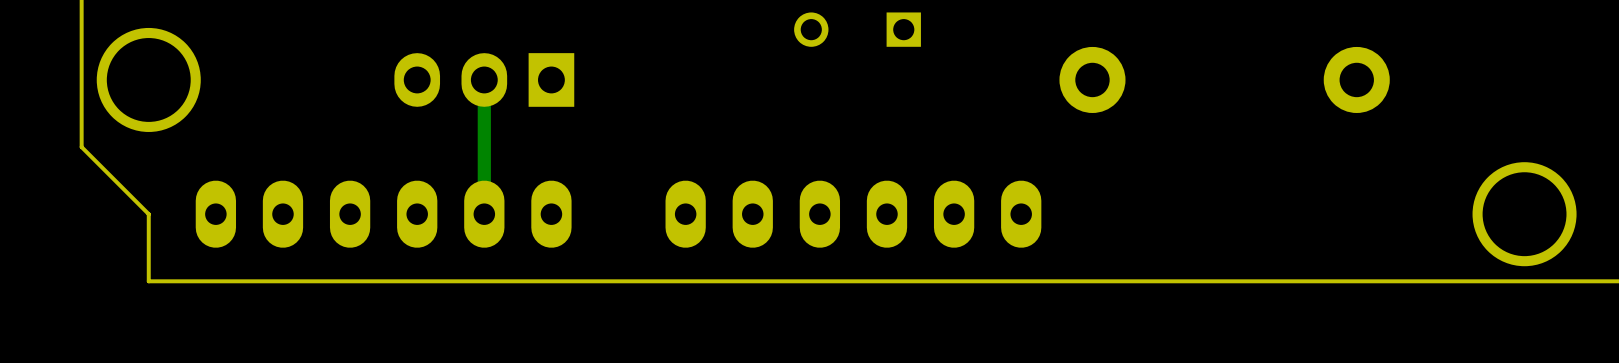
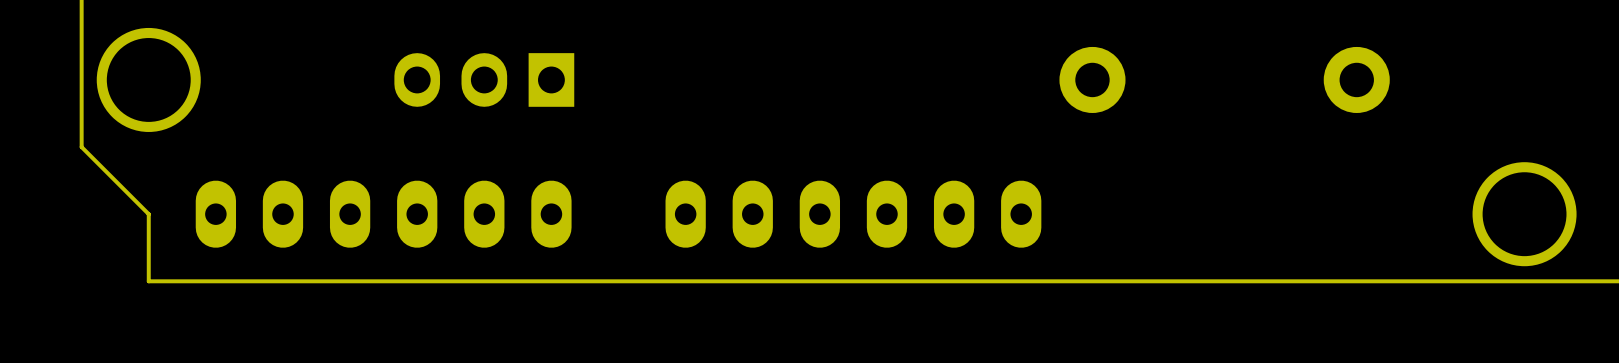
part: (857, 29) -> none
track: (484, 79) (484, 214) -> none

